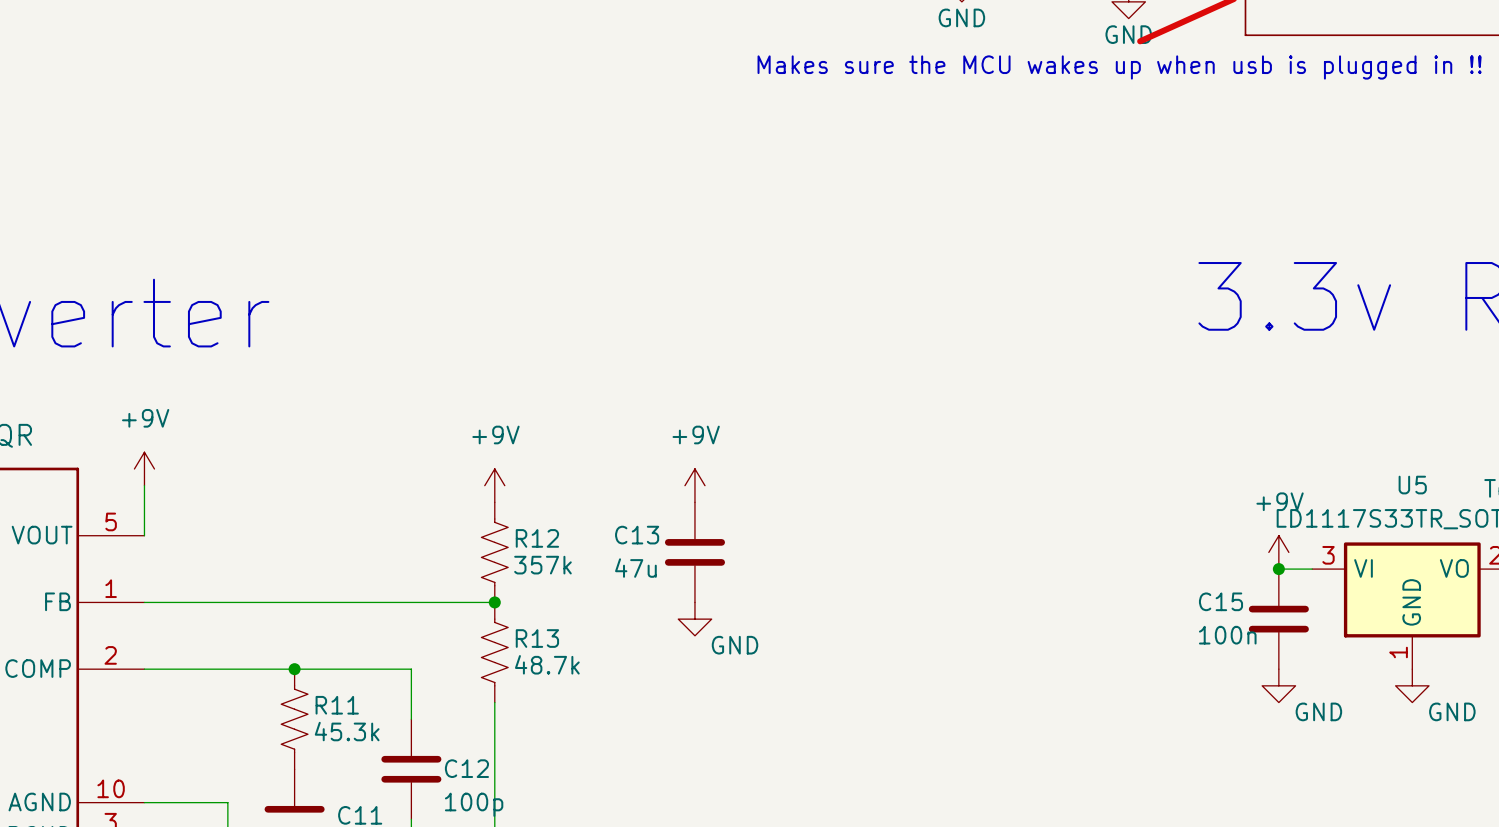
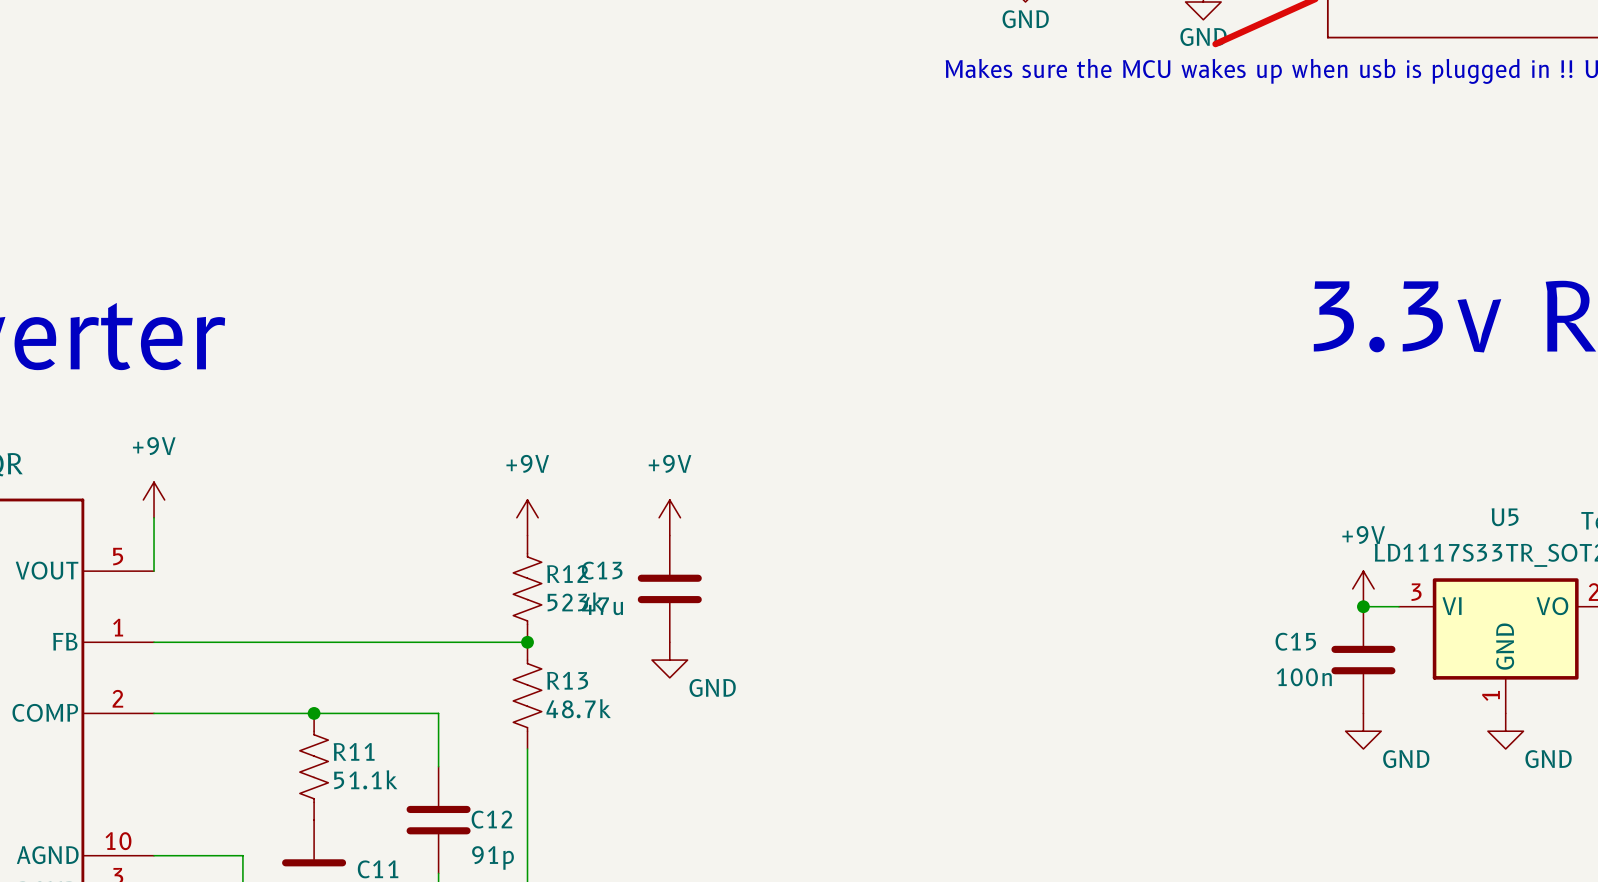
power symbol position: +9V (694, 485) -> +9V (669, 517)
C13 position: (694, 552) -> (669, 588)
R12 value: 357k (542, 565) -> 523k (575, 601)
power symbol position: GND (694, 619) -> GND (669, 660)
R11 value: 45.3k (347, 731) -> 51.1k (365, 779)
C12 value: 100p (474, 804) -> 91p (492, 857)

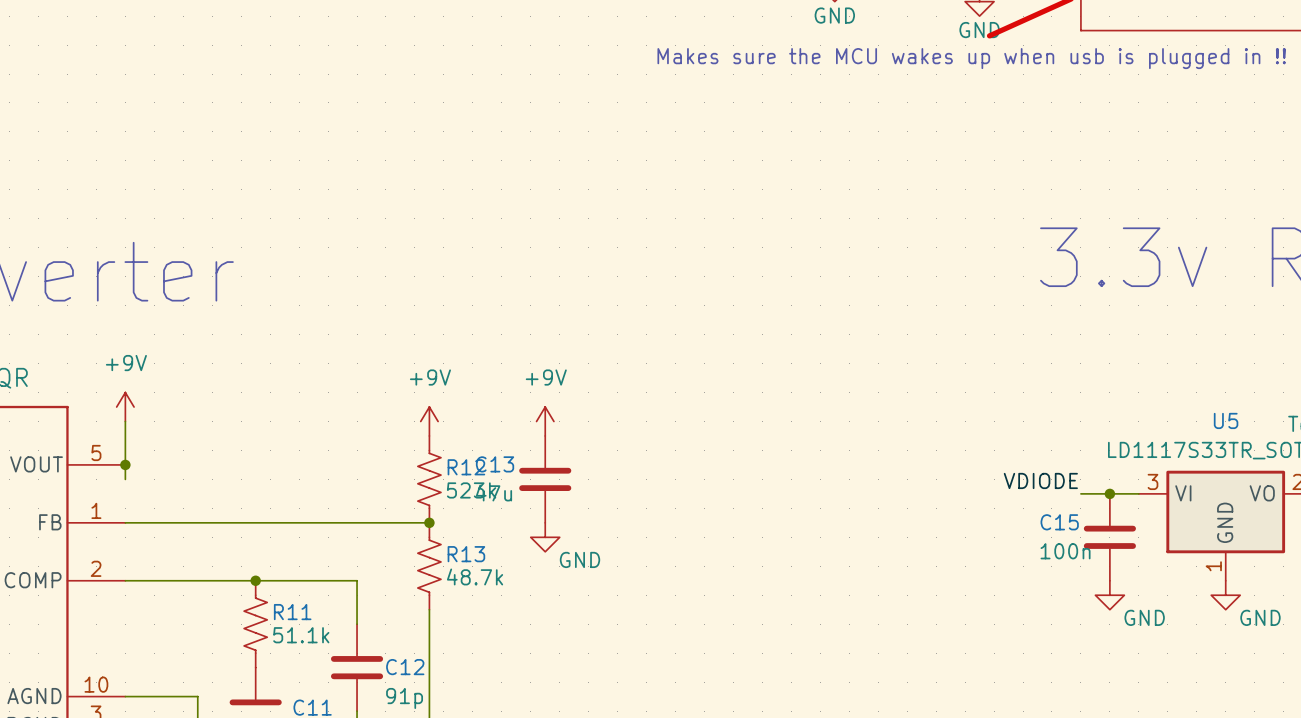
wire: none -> (125, 464) (125, 479)
junction: none -> (125, 464)
power symbol: +9V (1363, 588) -> none
label: none -> VDIODE (1040, 480)
wire: none -> (1080, 493) (1109, 493)

